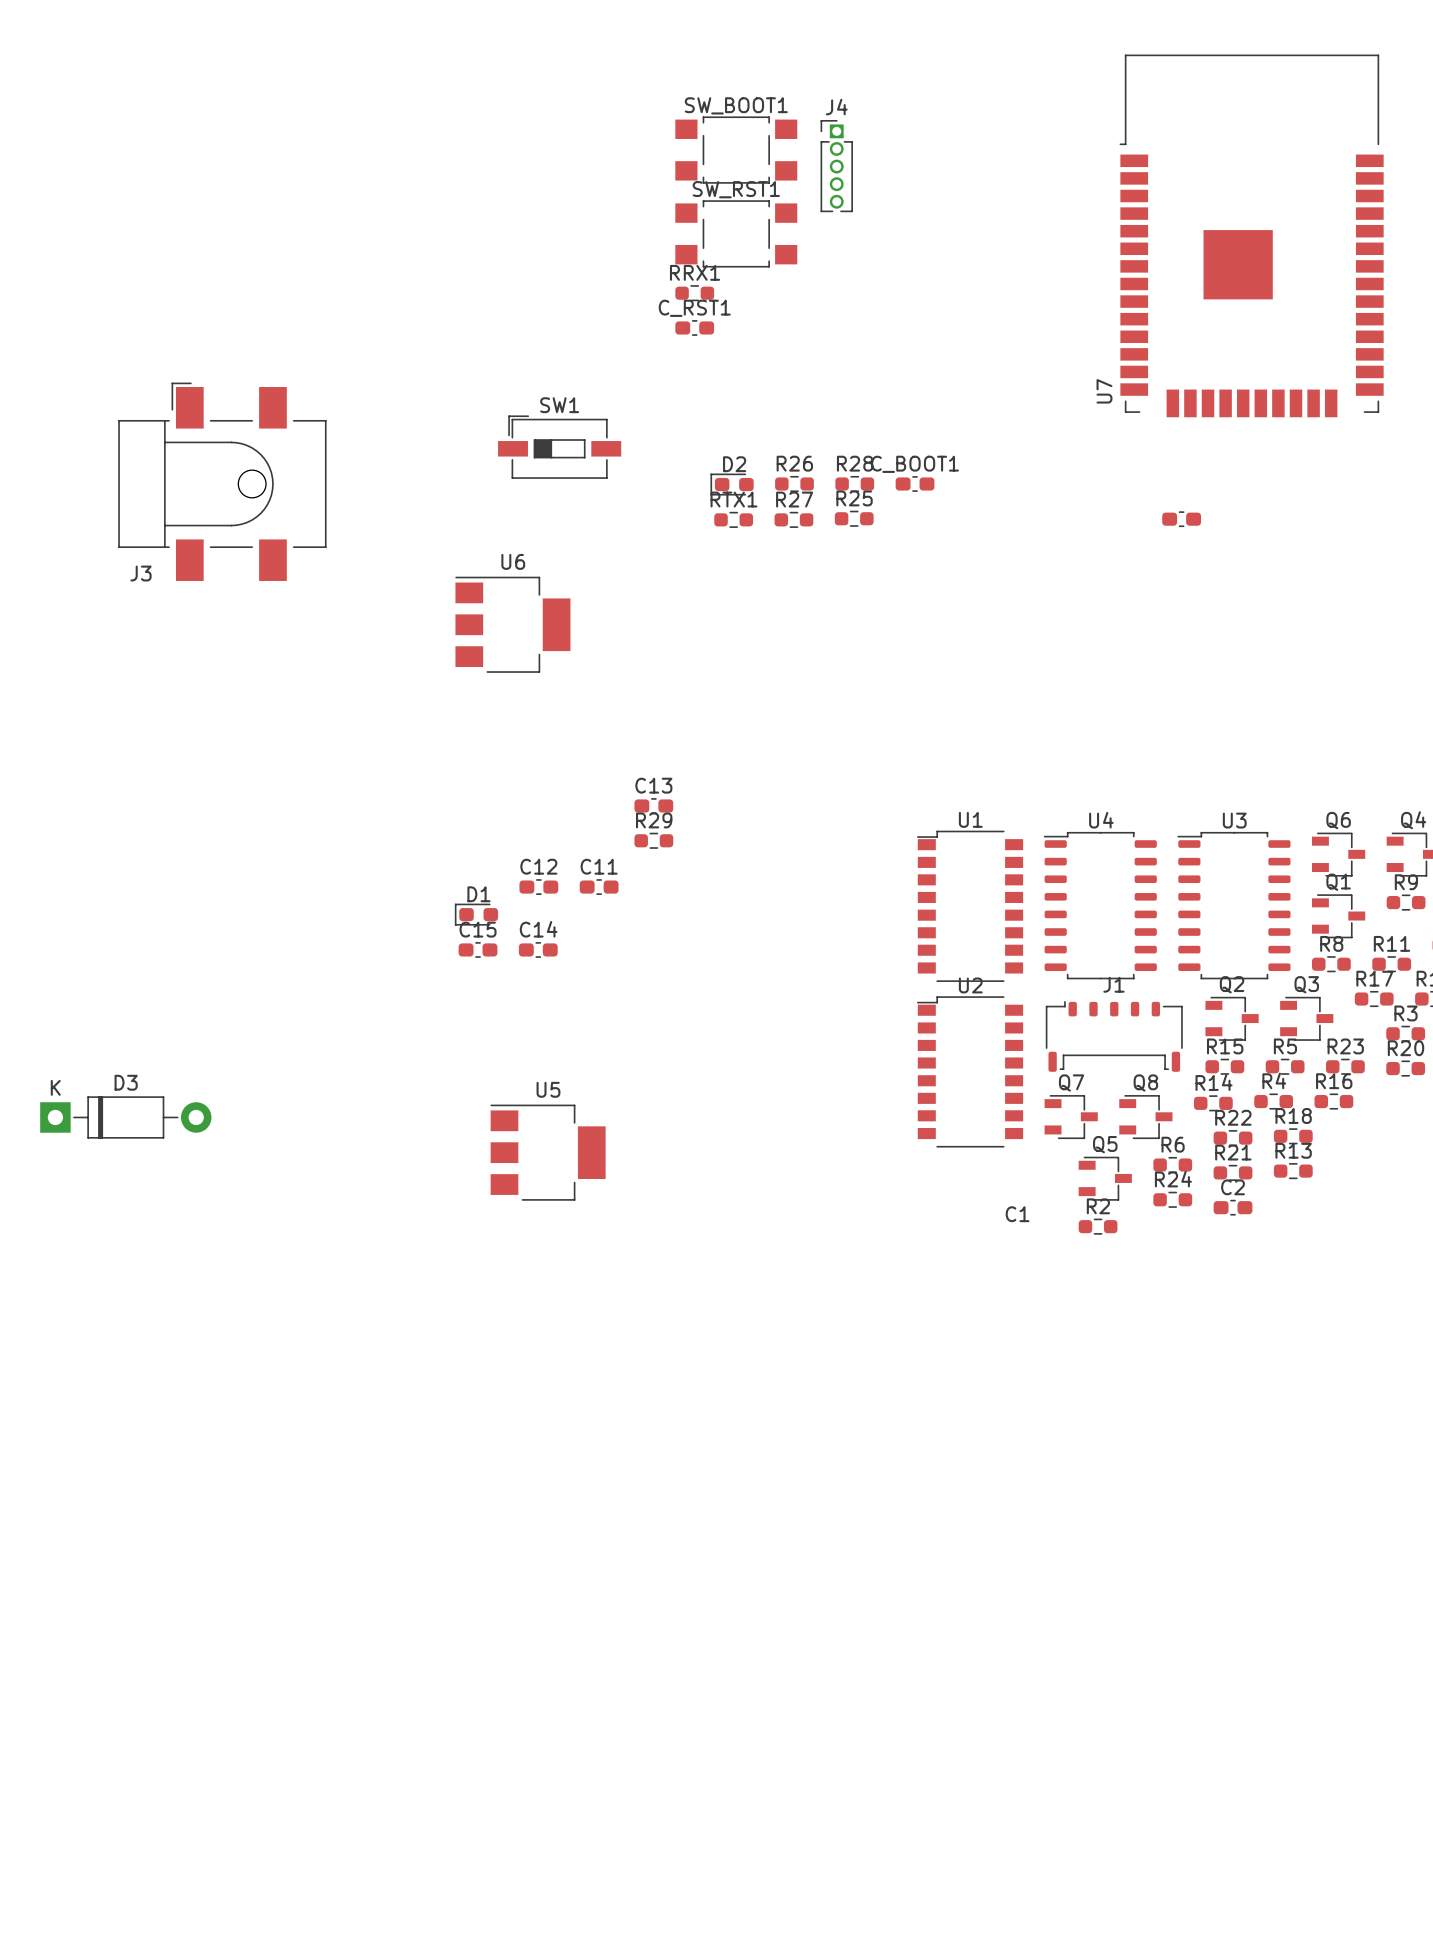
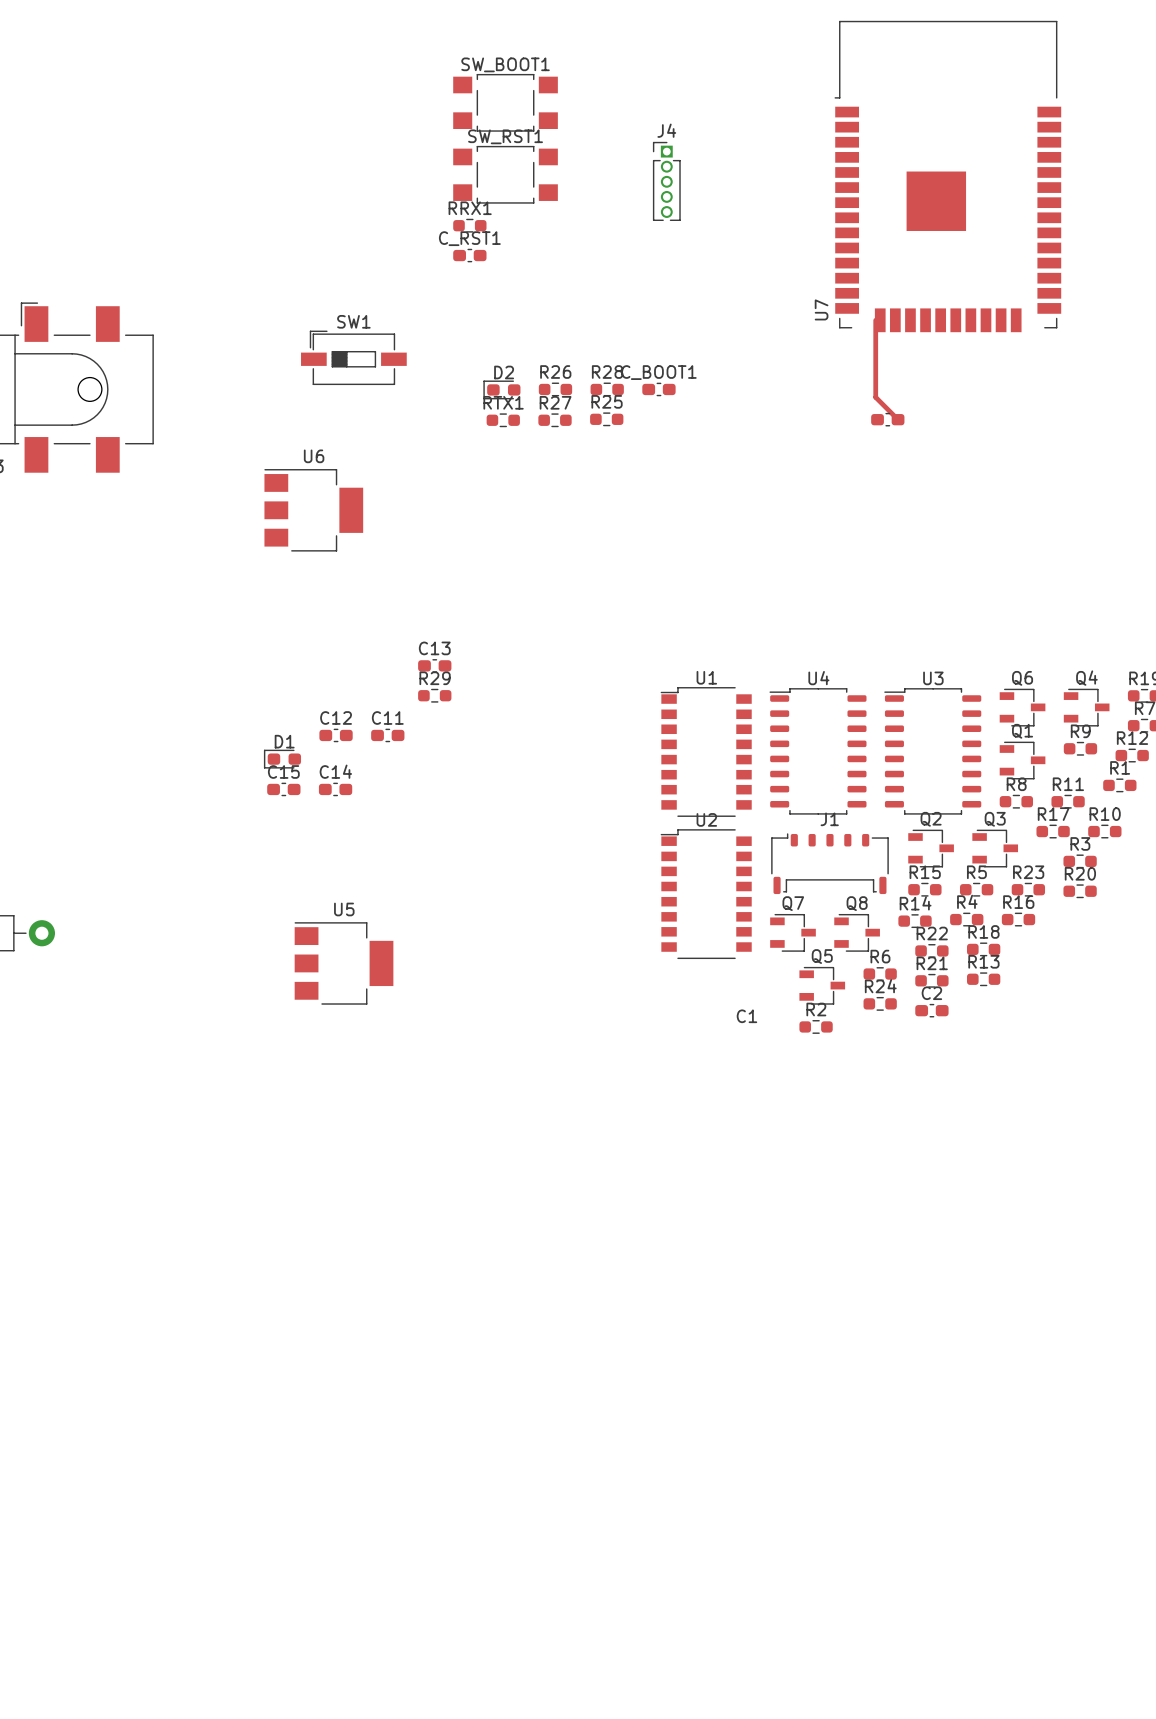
J4 position: (836, 166) -> (666, 181)
track: none -> (875, 320) (875, 397) (898, 419)

